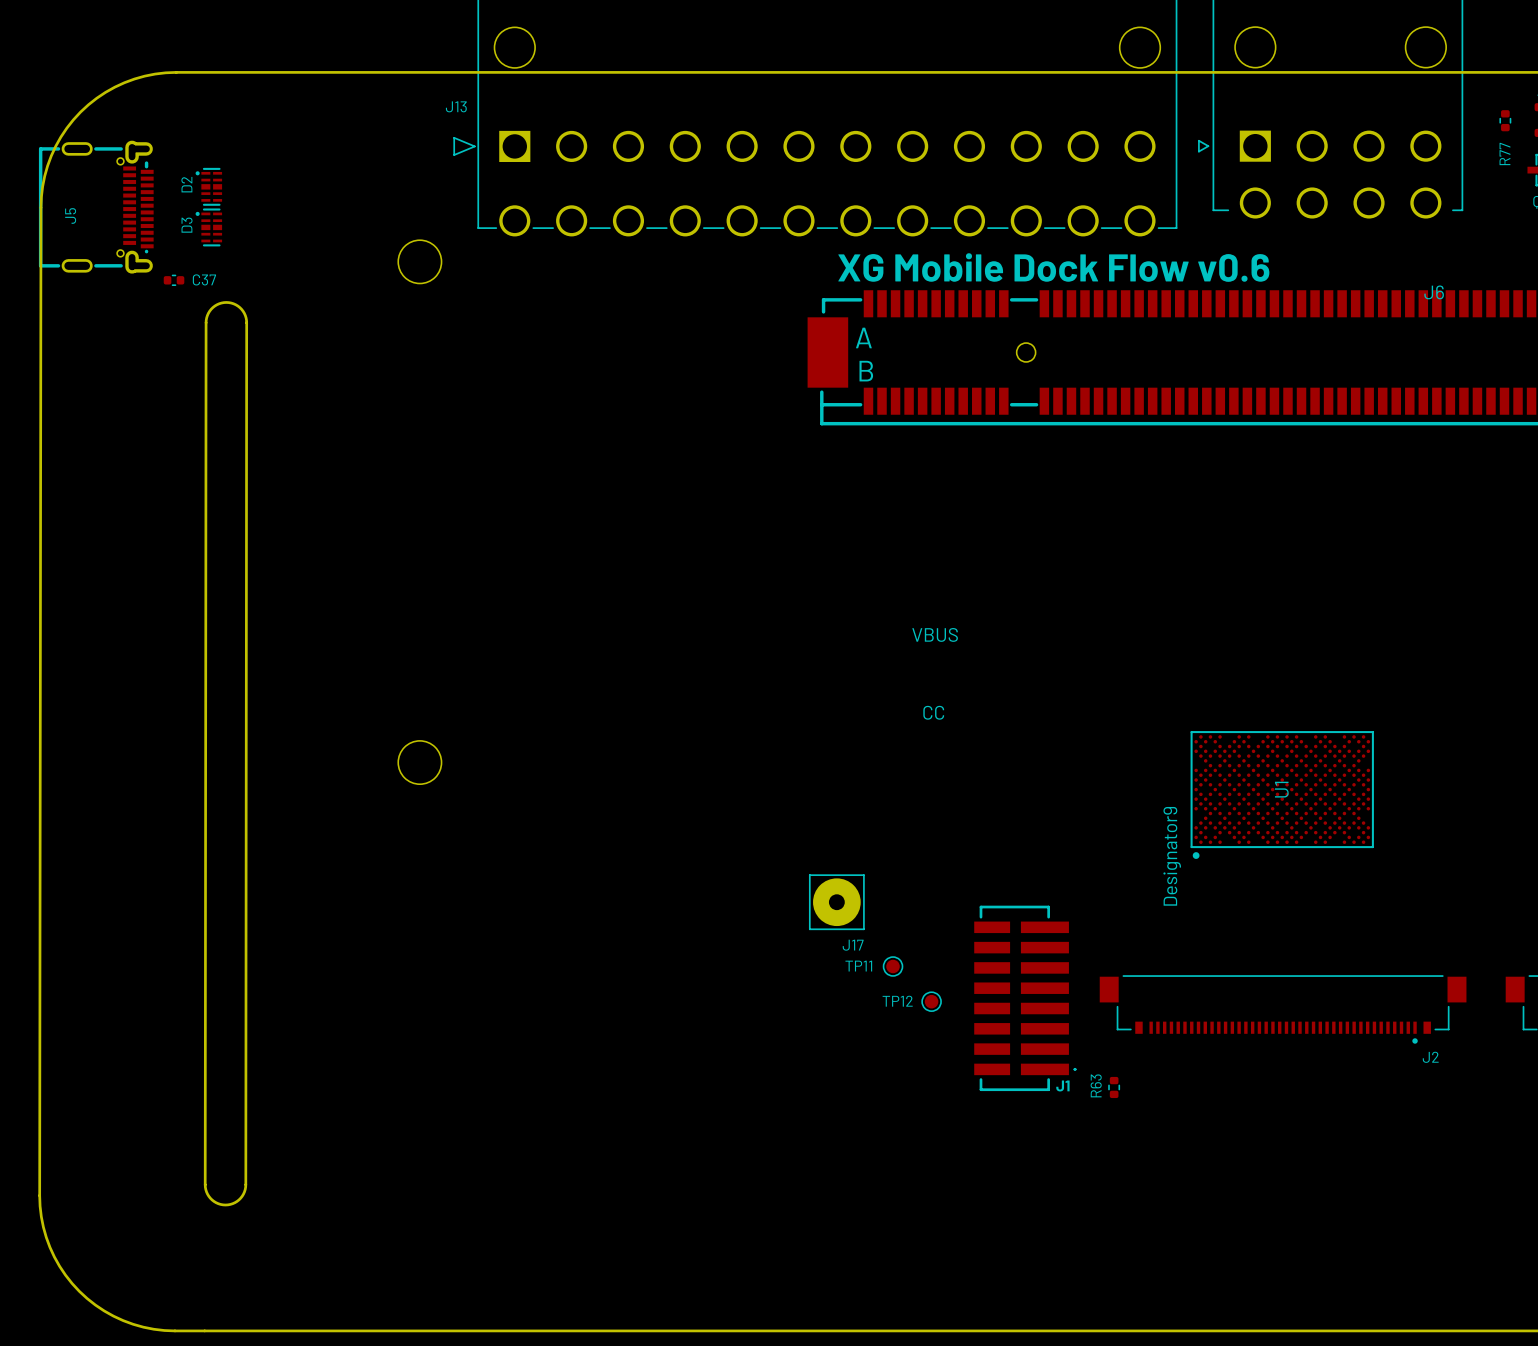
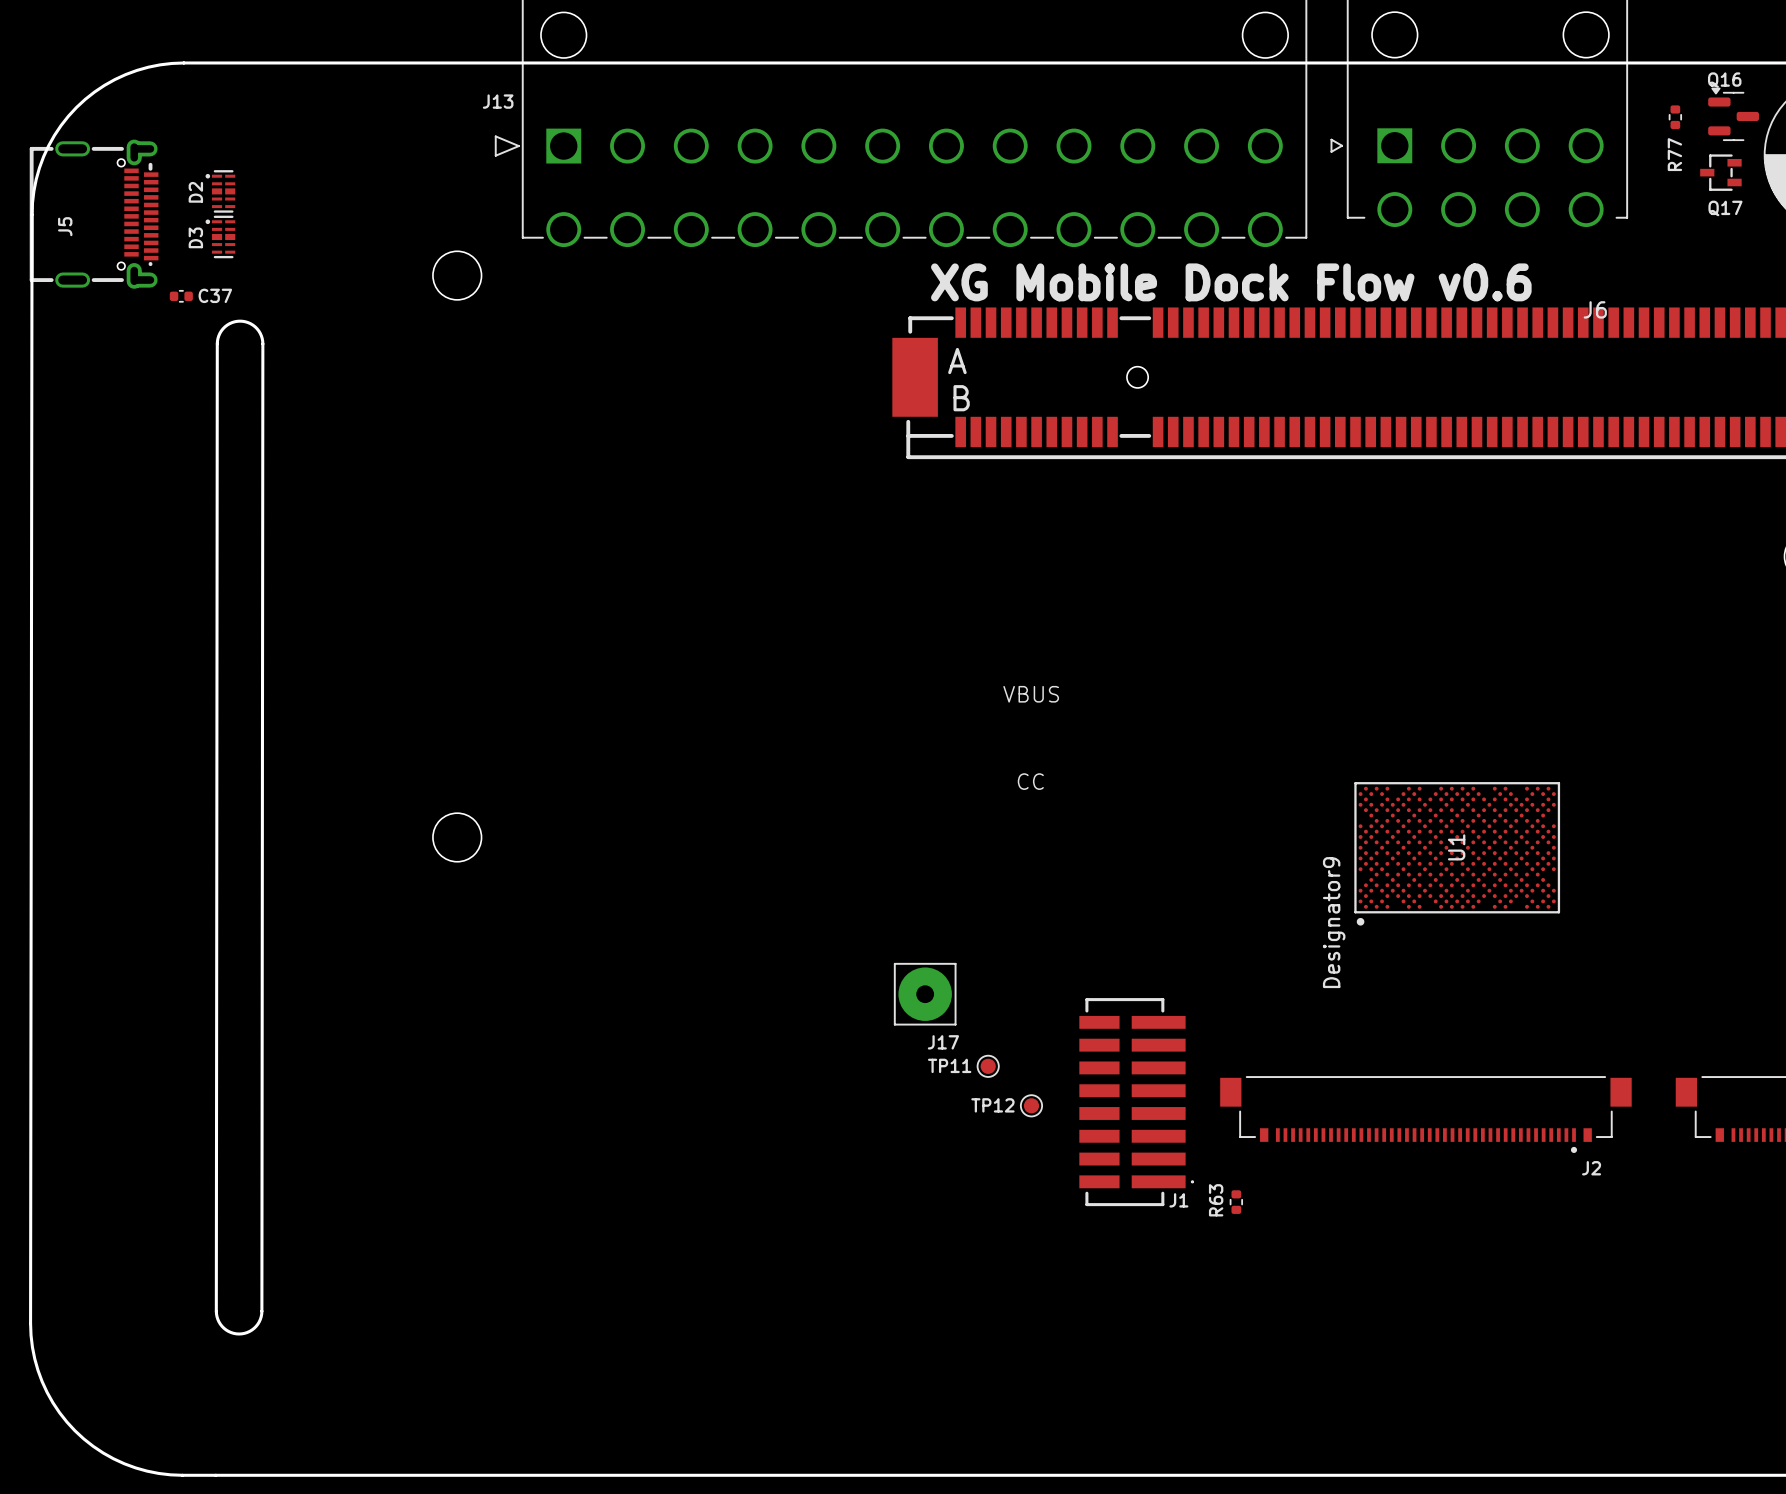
U1 position: (1282, 794) -> (1457, 853)

